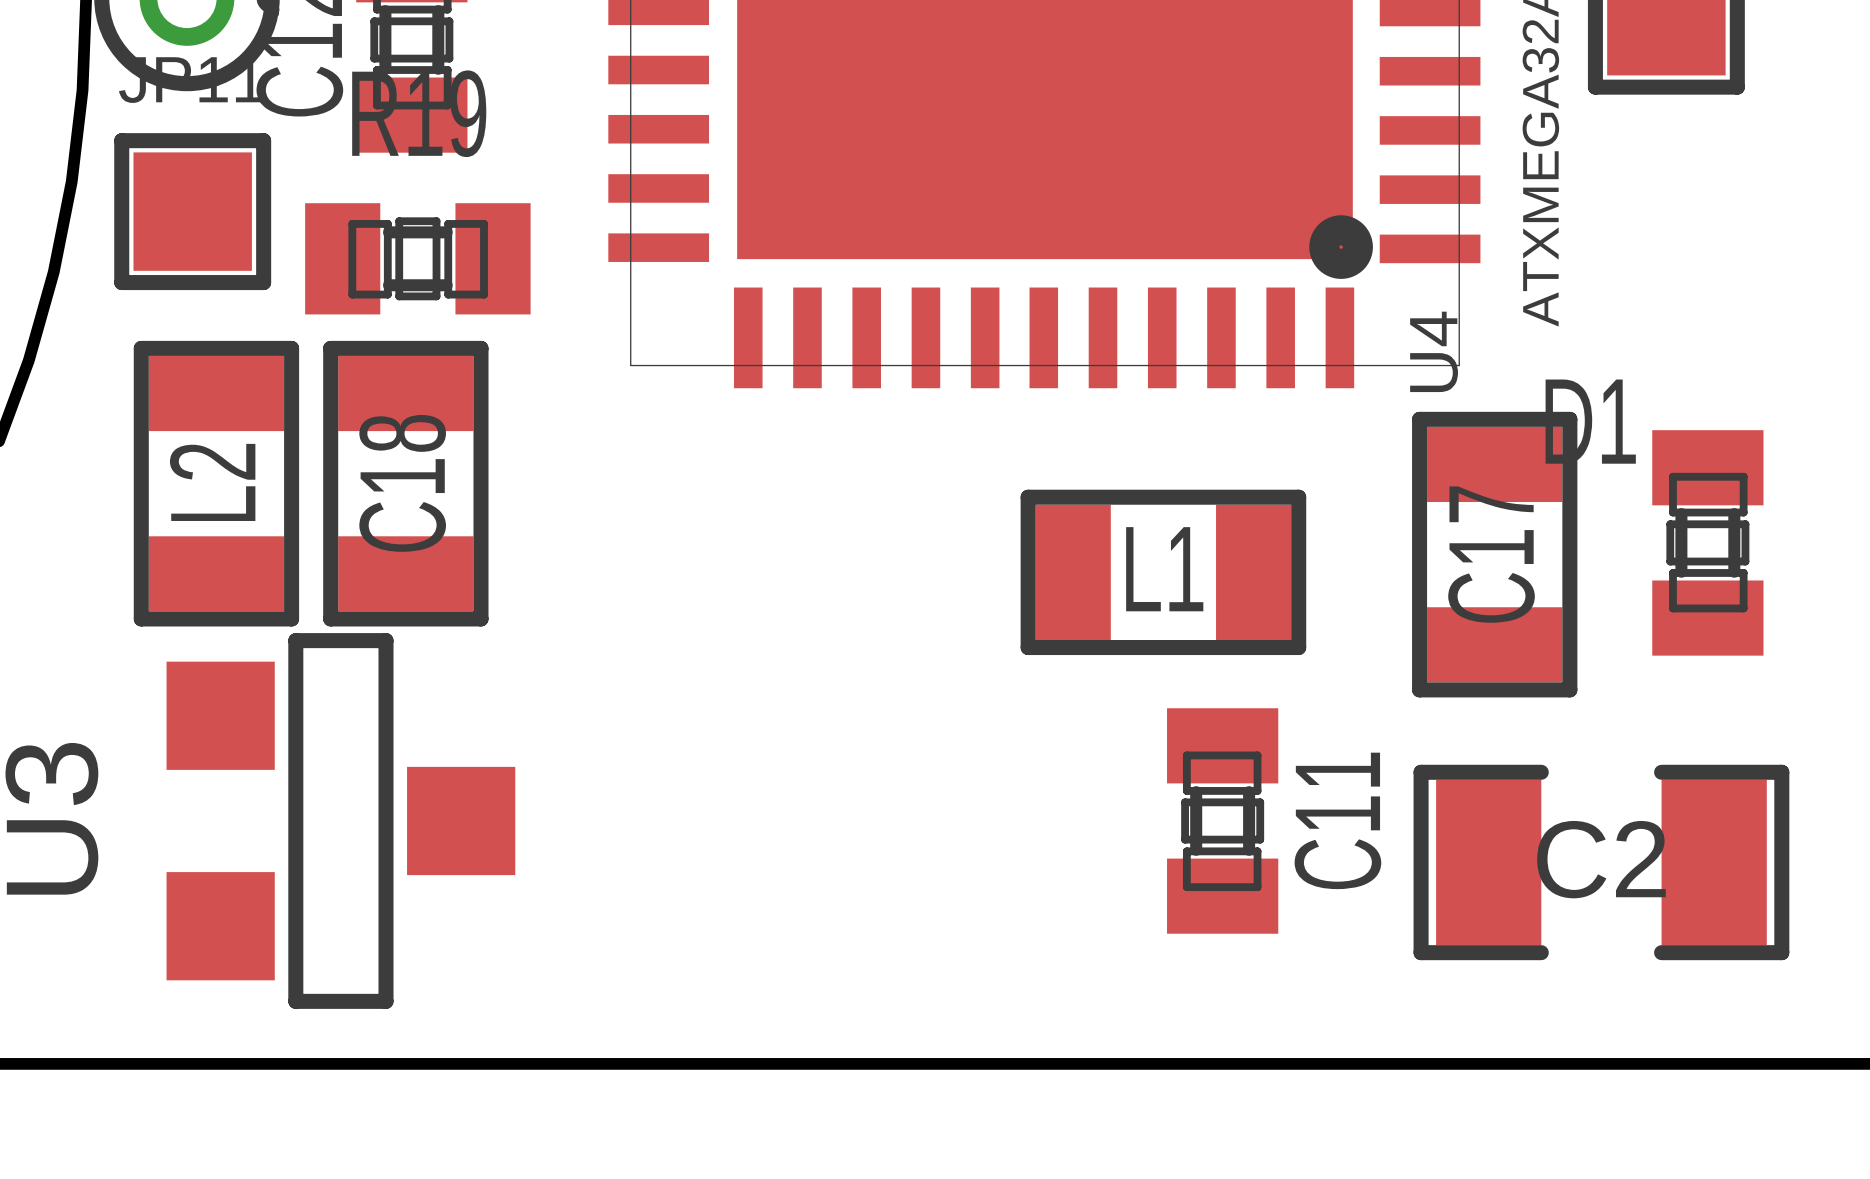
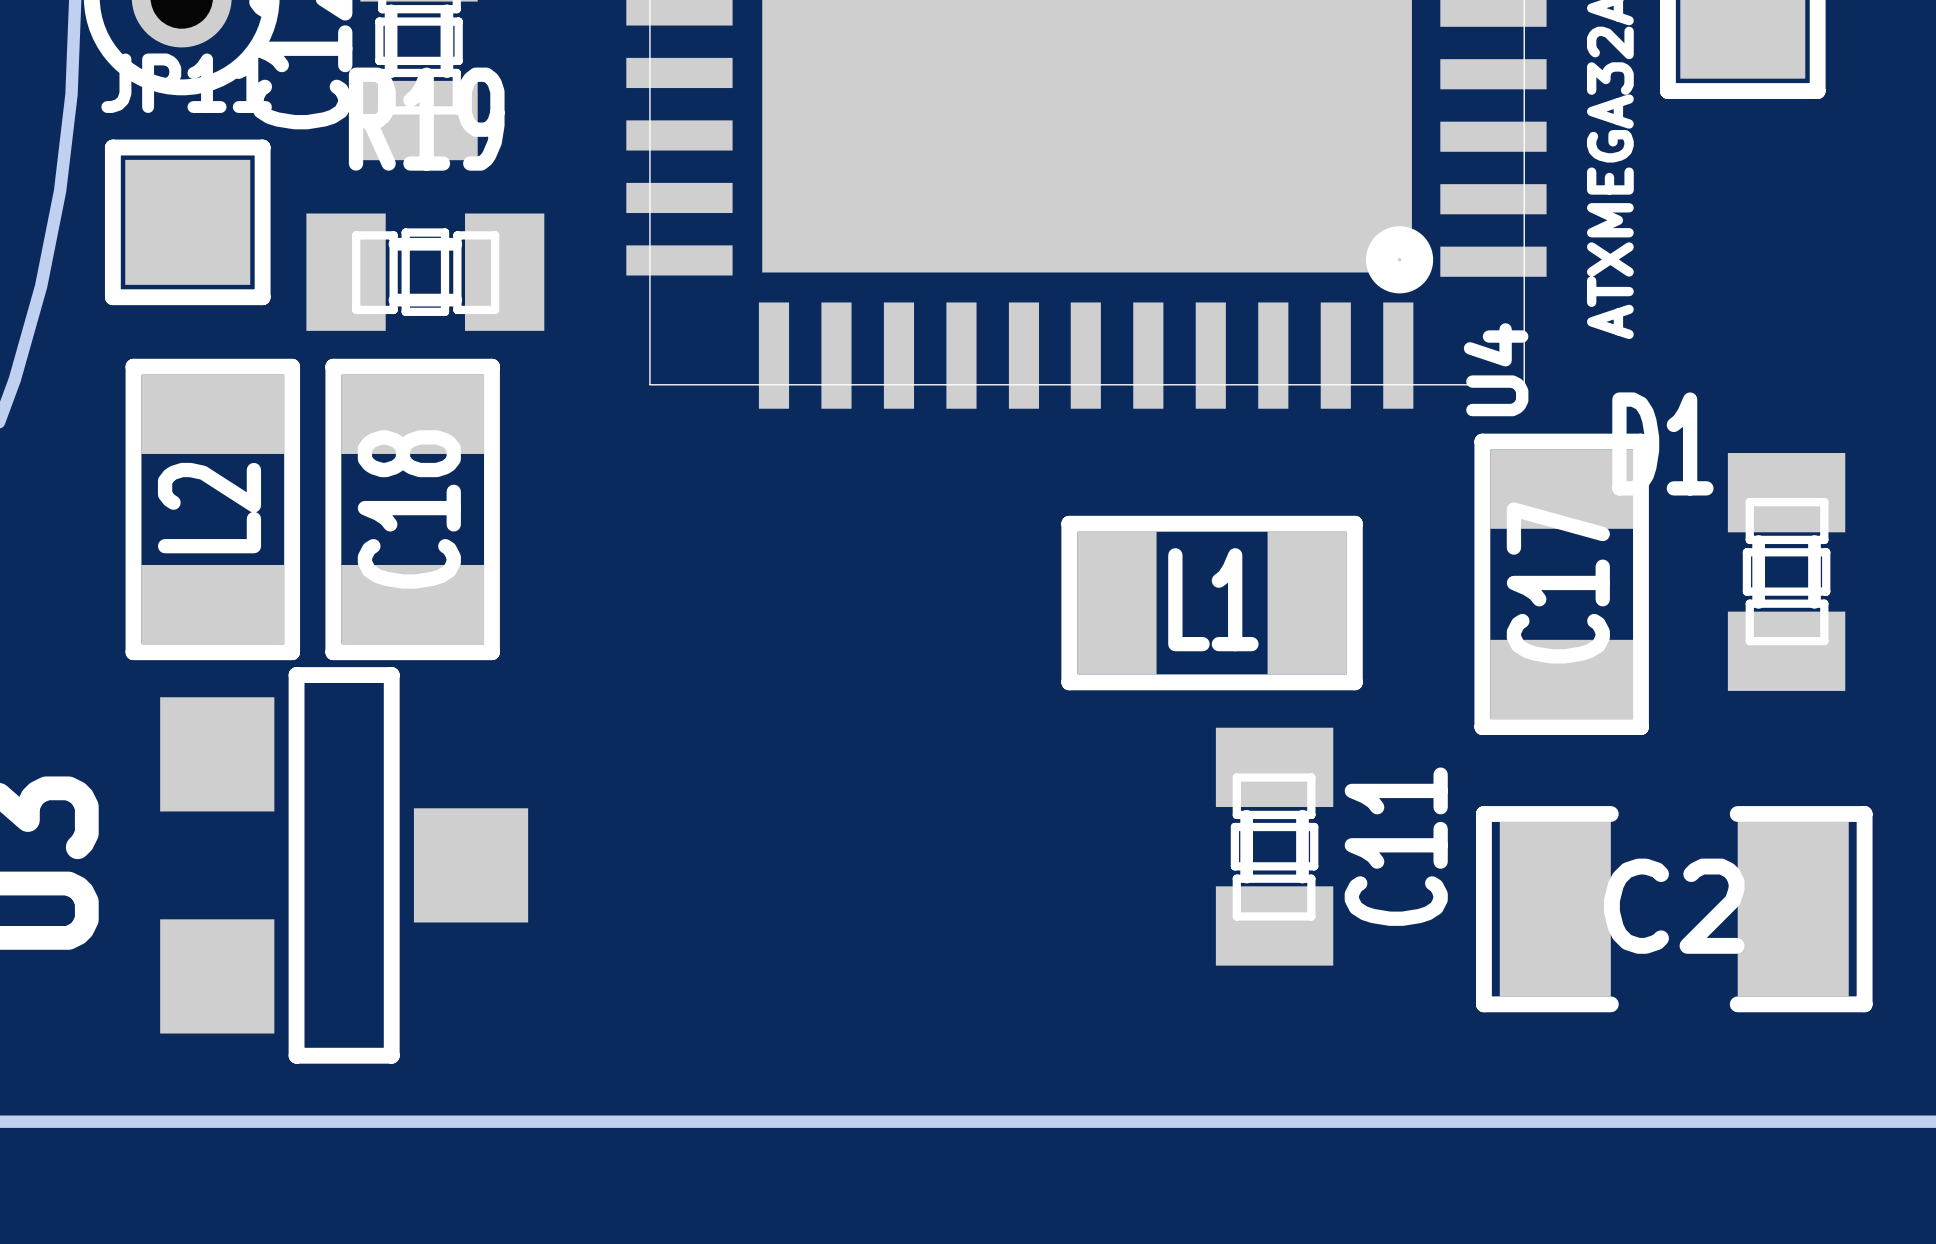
C11 position: (1222, 820) -> (1274, 846)

